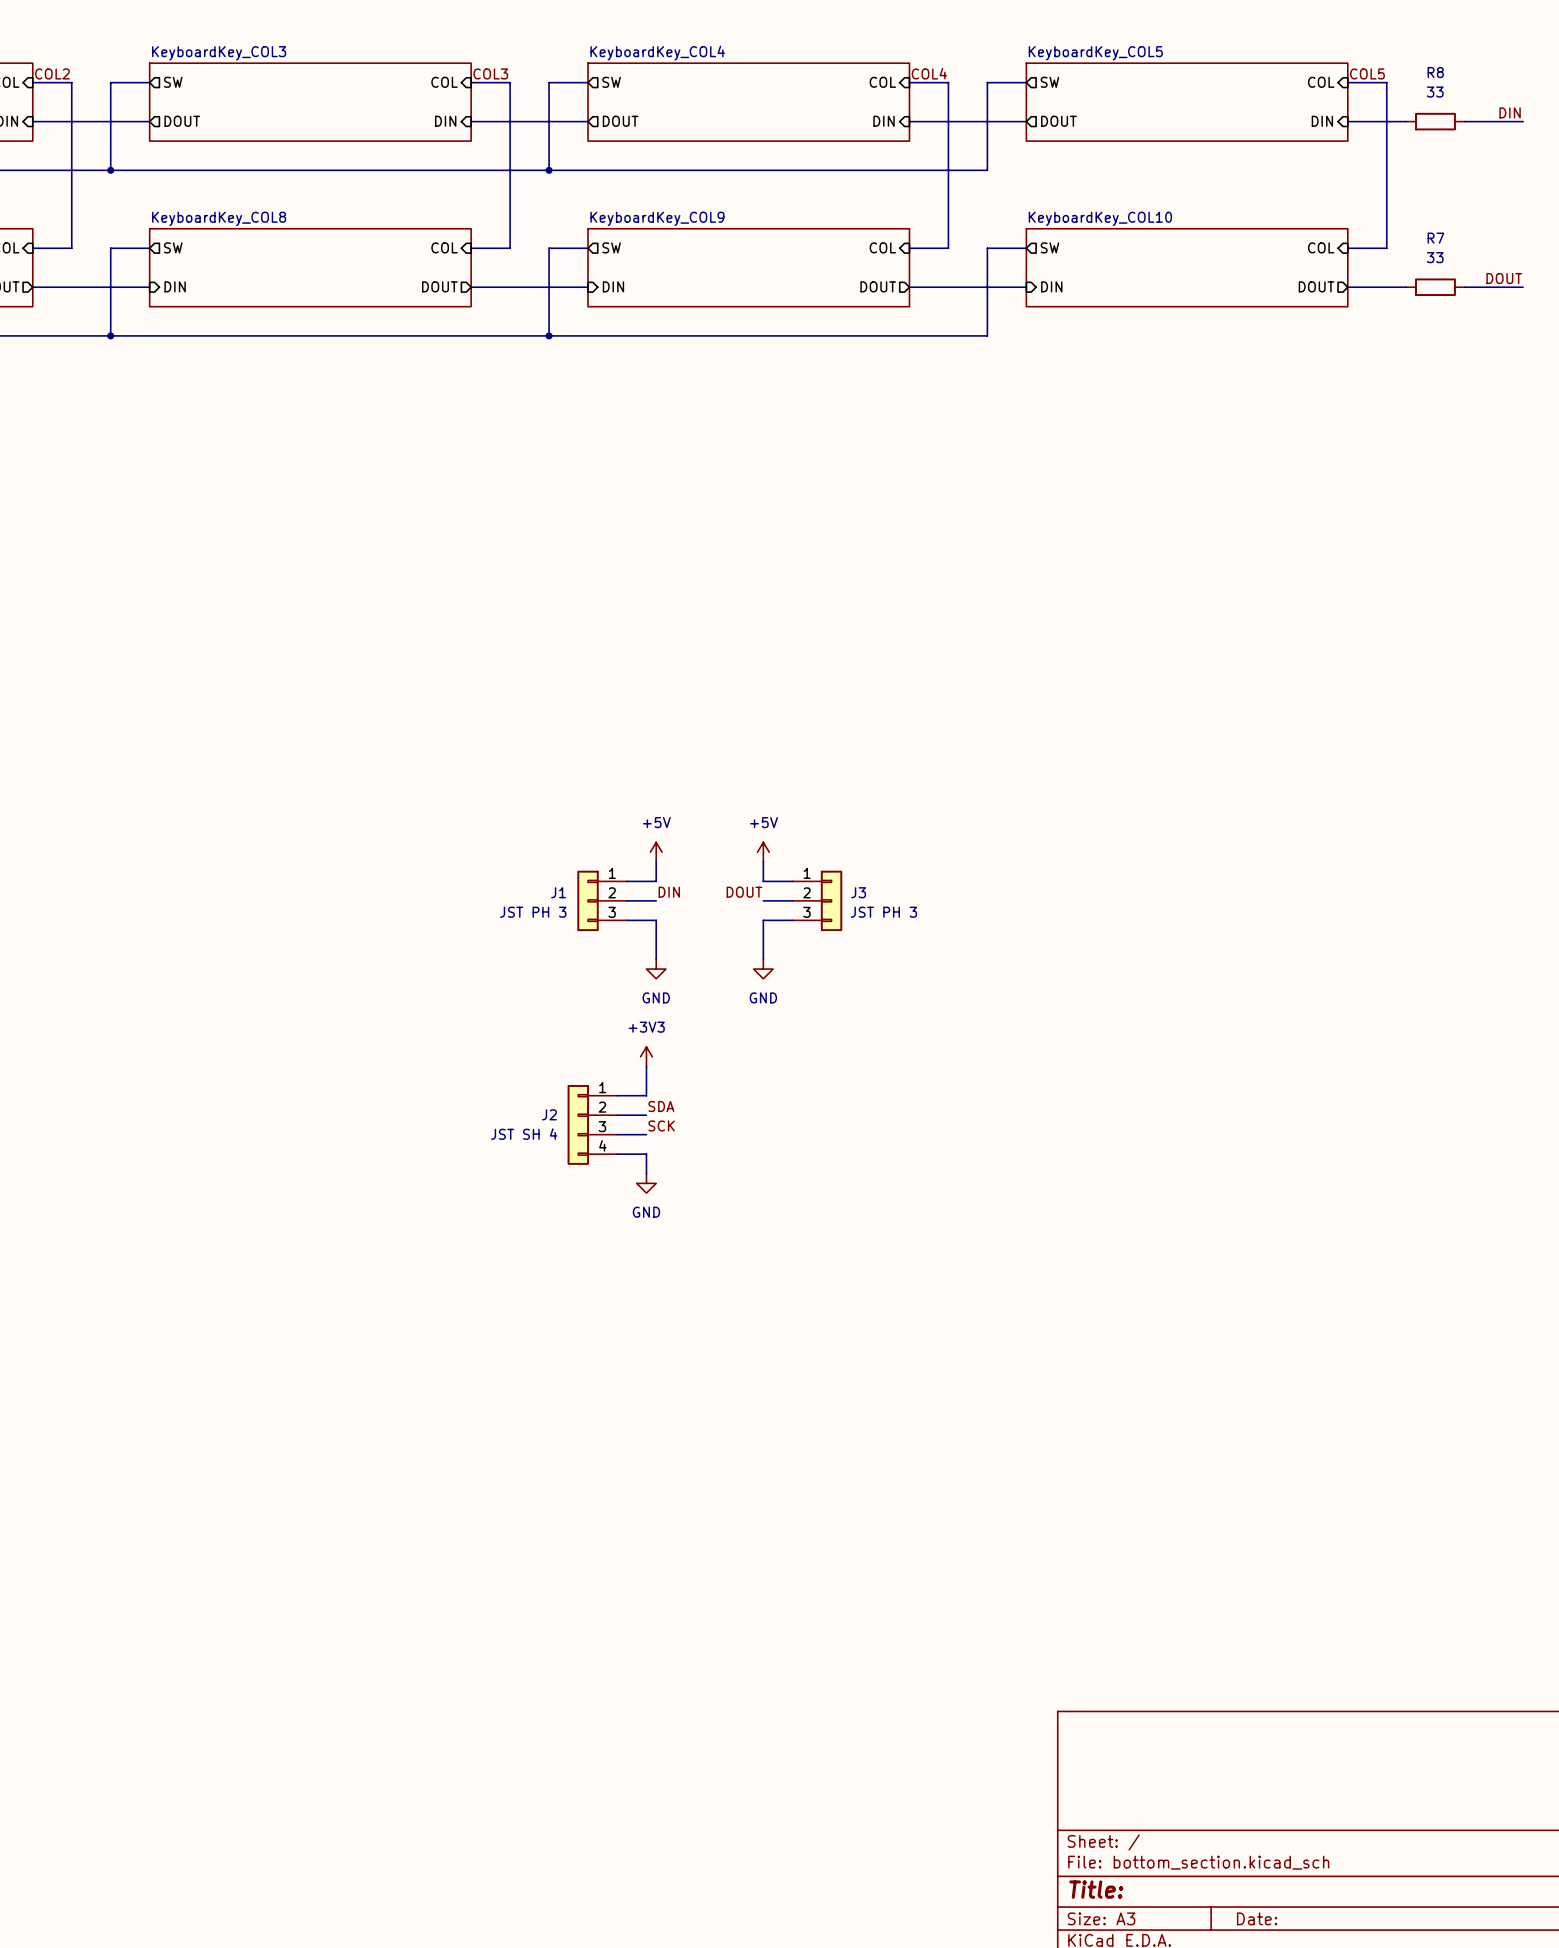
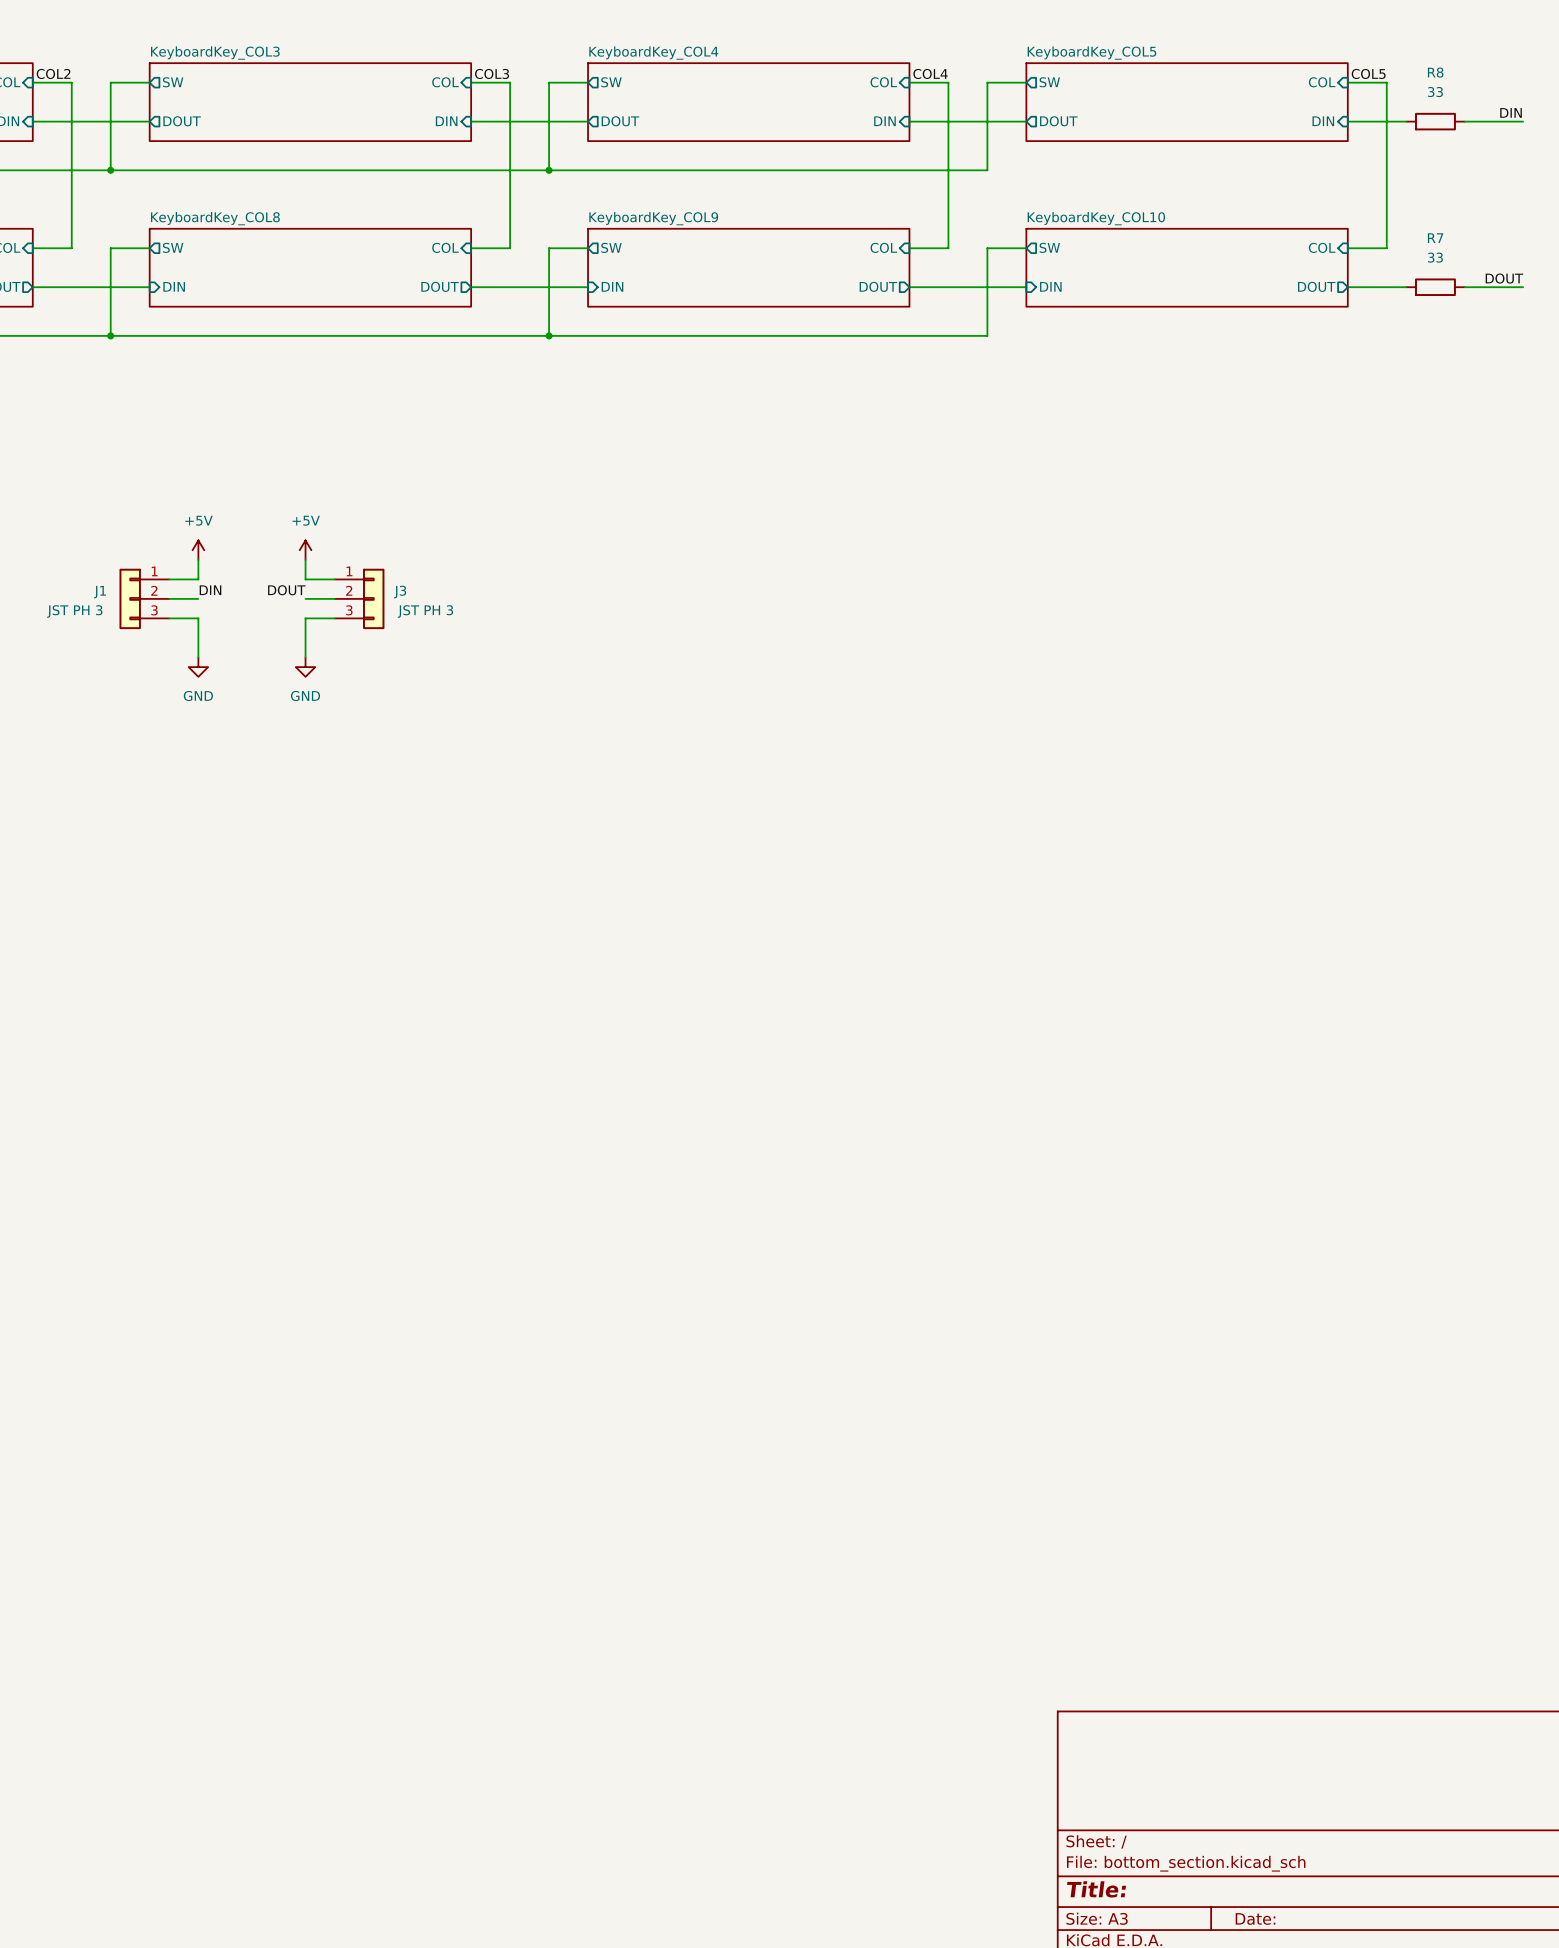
power symbol: none -> +5V (198, 550)
power symbol: none -> +5V (305, 550)
wire: none -> (198, 559) (198, 579) (169, 579)
wire: none -> (305, 559) (305, 579) (334, 579)
label: none -> DIN (210, 590)
label: none -> DOUT (286, 590)
wire: none -> (169, 598) (198, 598)
wire: none -> (305, 598) (334, 598)
wire: none -> (169, 618) (198, 618) (198, 657)
wire: none -> (334, 618) (305, 618) (305, 657)
power symbol: none -> GND (198, 667)
power symbol: none -> GND (305, 667)
power symbol: +5V (656, 852) -> none
power symbol: +5V (763, 852) -> none
wire: (656, 861) (656, 881) (626, 881) -> none
wire: (763, 861) (763, 881) (792, 881) -> none
label: DIN (669, 892) -> none
label: DOUT (744, 892) -> none
J1 position: (602, 900) -> (144, 598)
wire: (626, 900) (656, 900) -> none
wire: (763, 900) (792, 900) -> none
J3 position: (817, 900) -> (359, 598)
wire: (626, 920) (656, 920) (656, 959) -> none
wire: (792, 920) (763, 920) (763, 959) -> none
power symbol: GND (656, 969) -> none
power symbol: GND (763, 969) -> none
power symbol: +3V3 (646, 1056) -> none
wire: (646, 1066) (646, 1095) (617, 1095) -> none
label: SDA (661, 1106) -> none
wire: (617, 1115) (646, 1115) -> none
J2: JST SH 4 (592, 1124) -> none
label: SCK (661, 1125) -> none
wire: (617, 1134) (646, 1134) -> none
wire: (617, 1154) (646, 1154) (646, 1173) -> none
power symbol: GND (646, 1183) -> none

